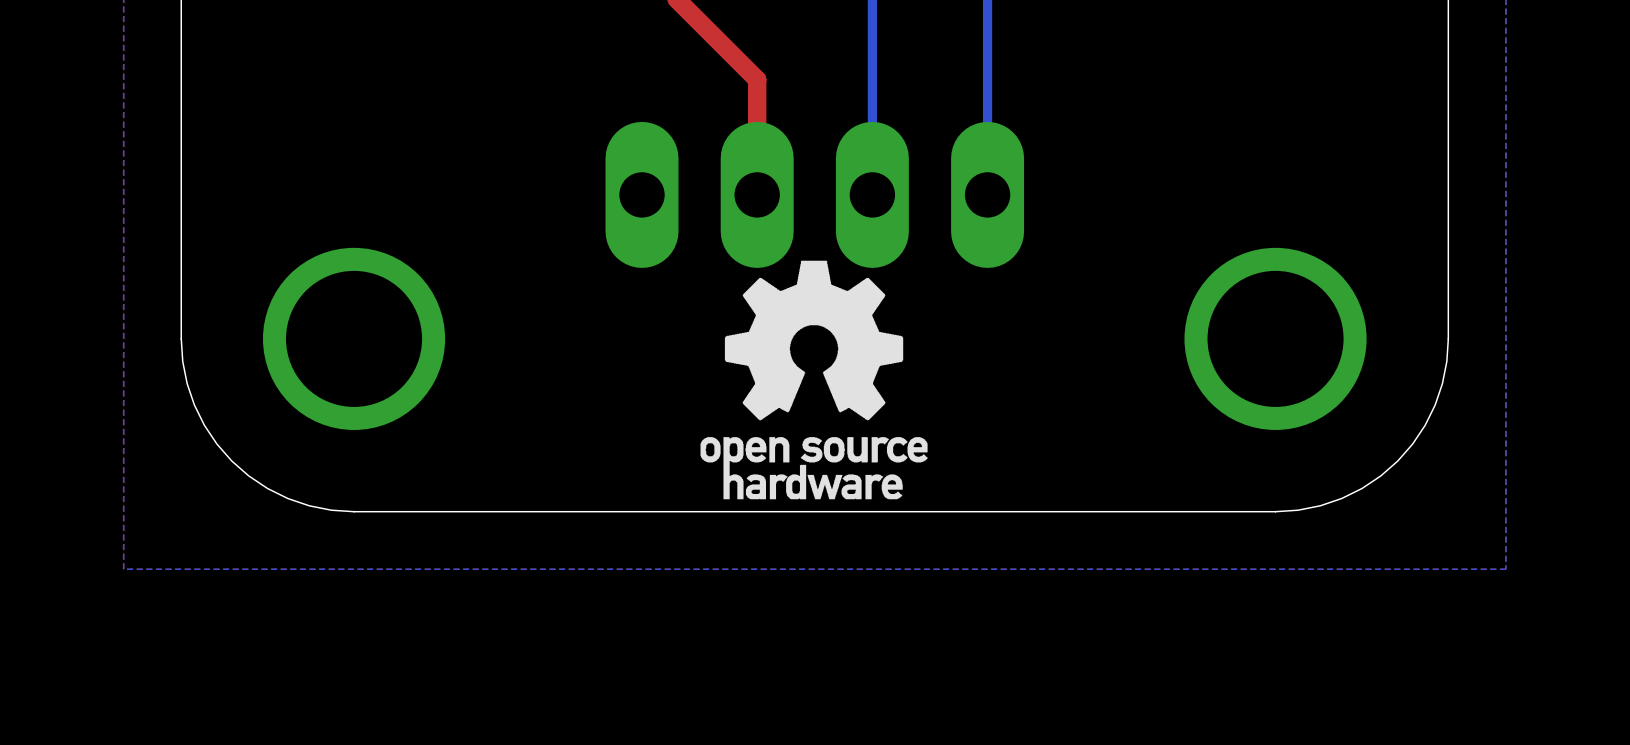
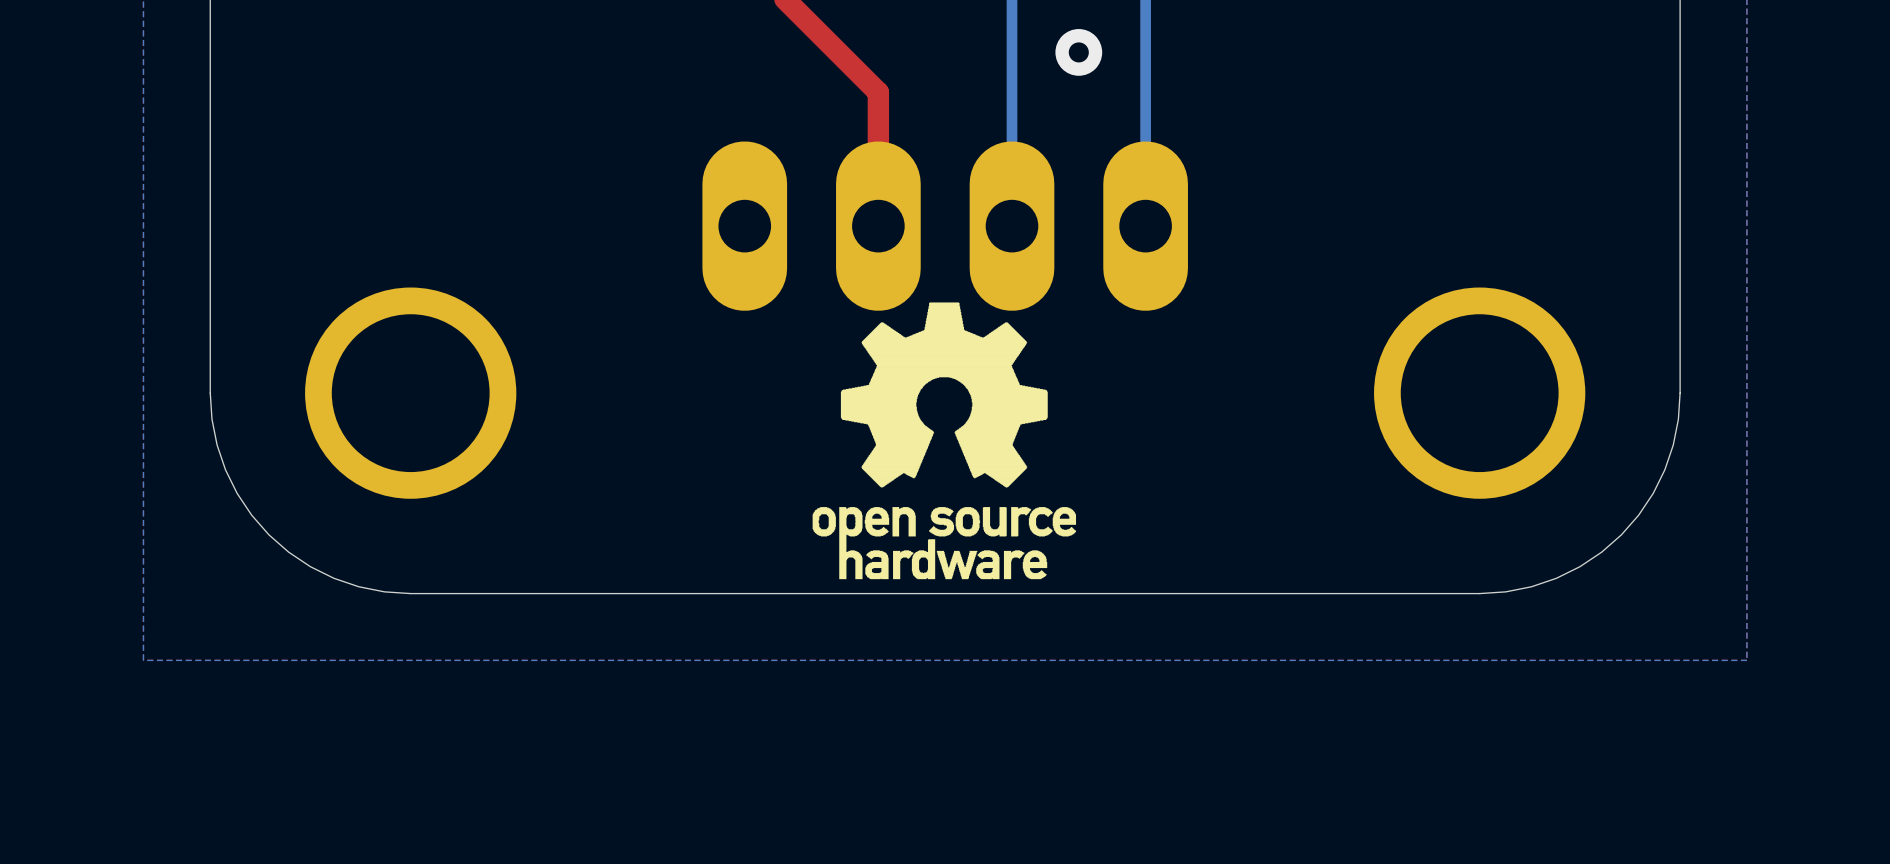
via: none -> (1078, 52)

